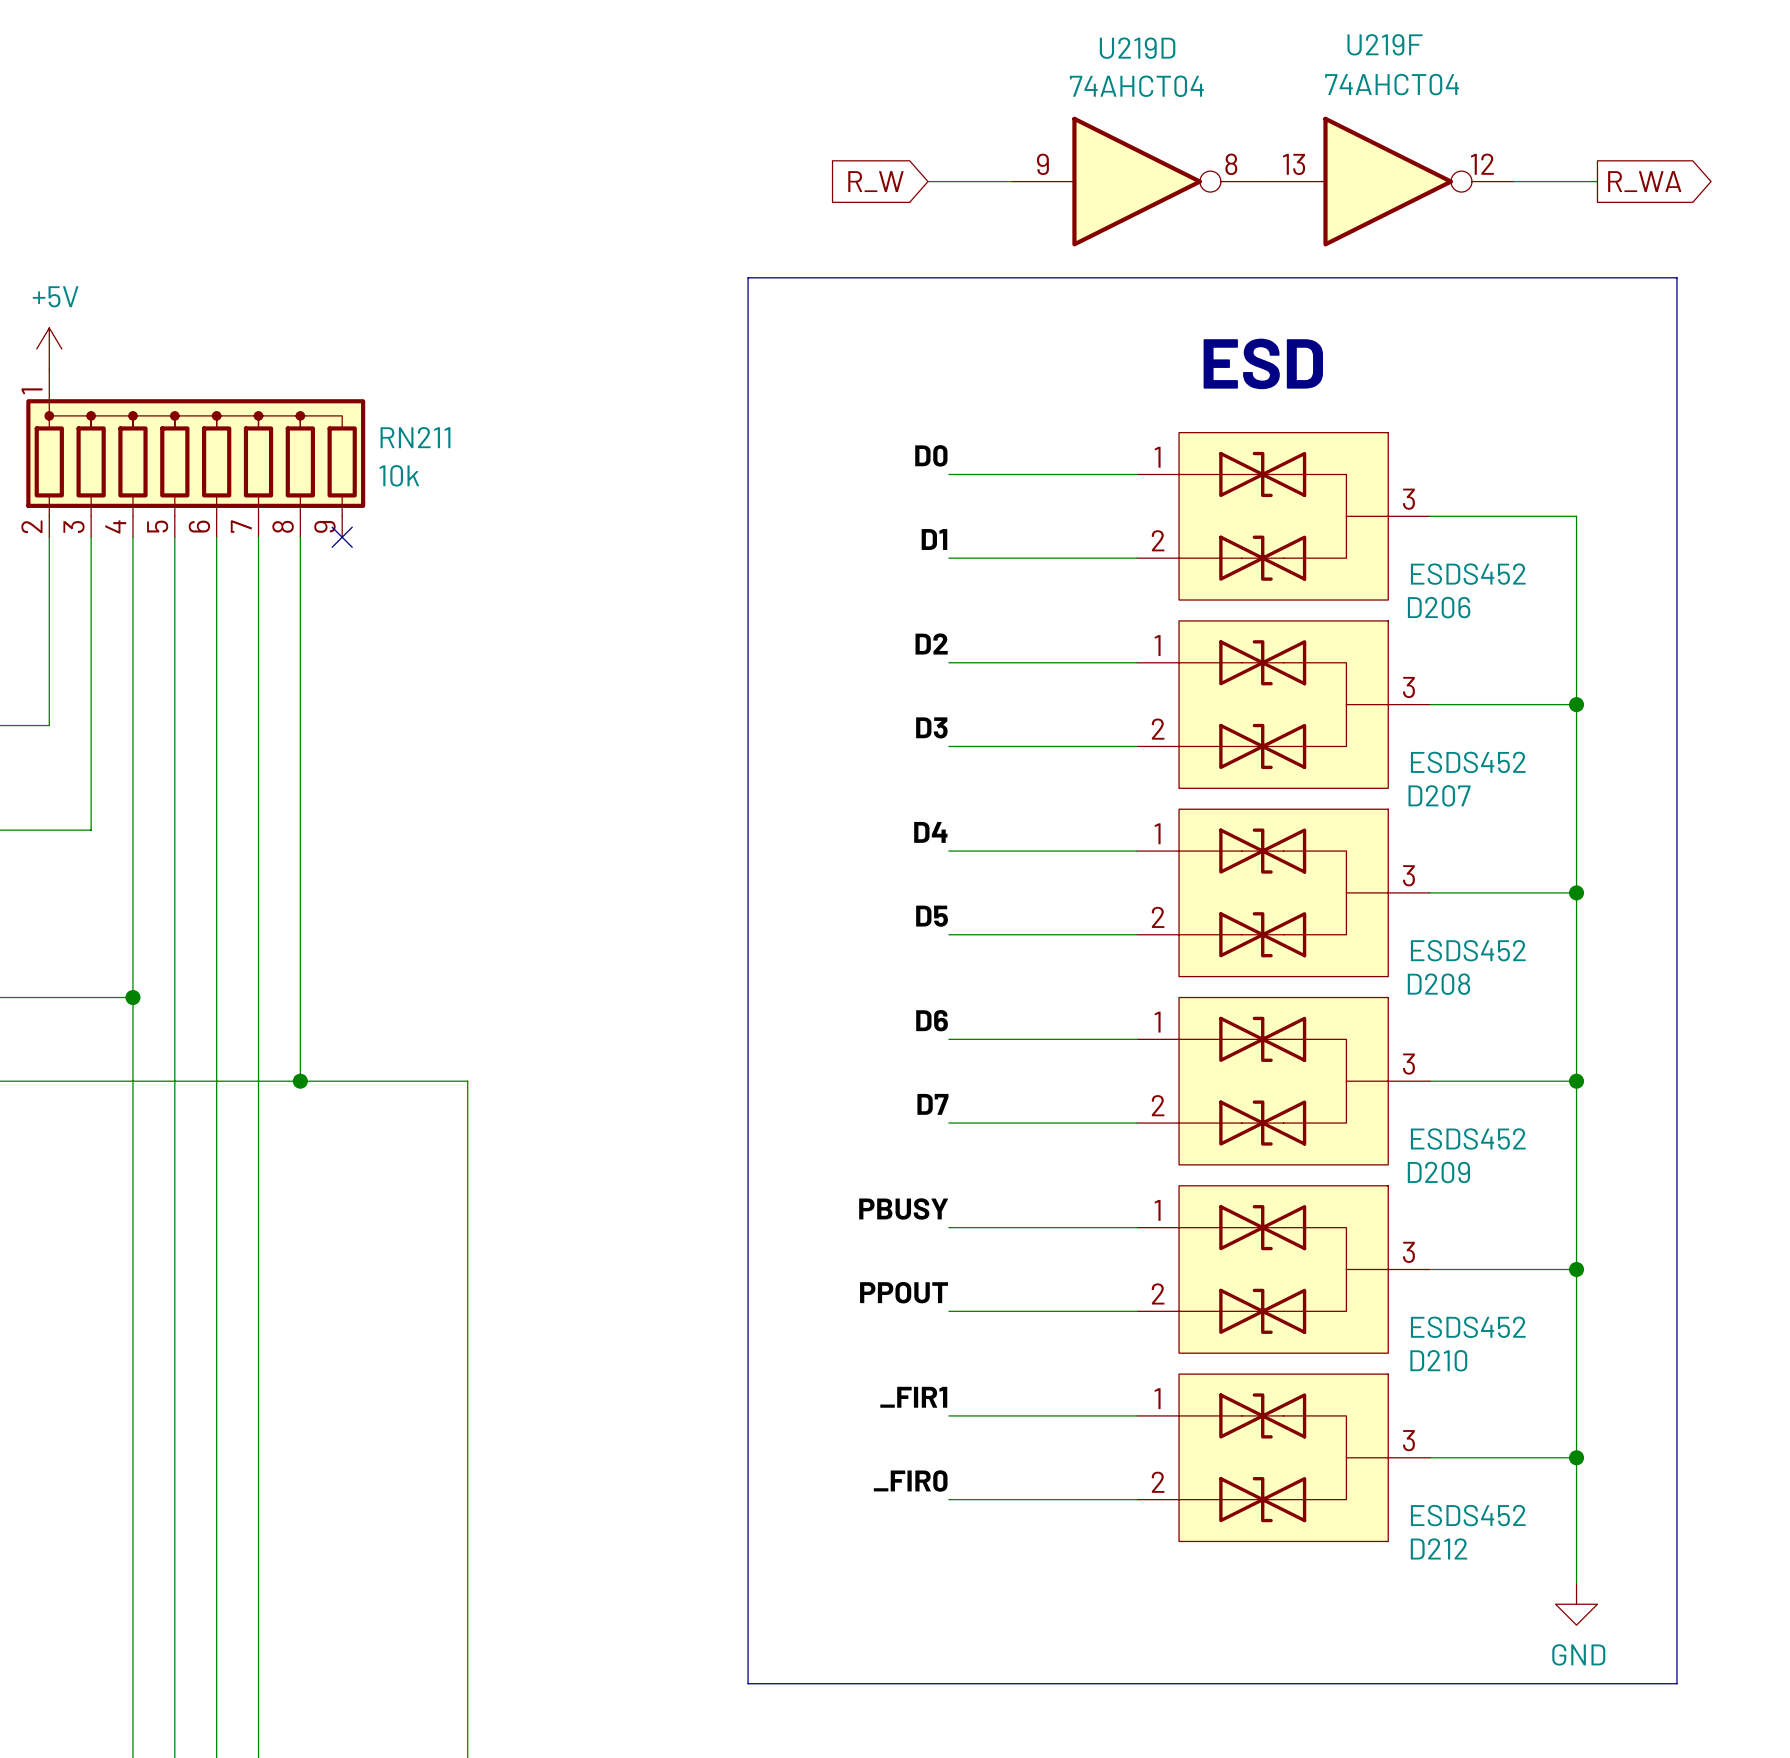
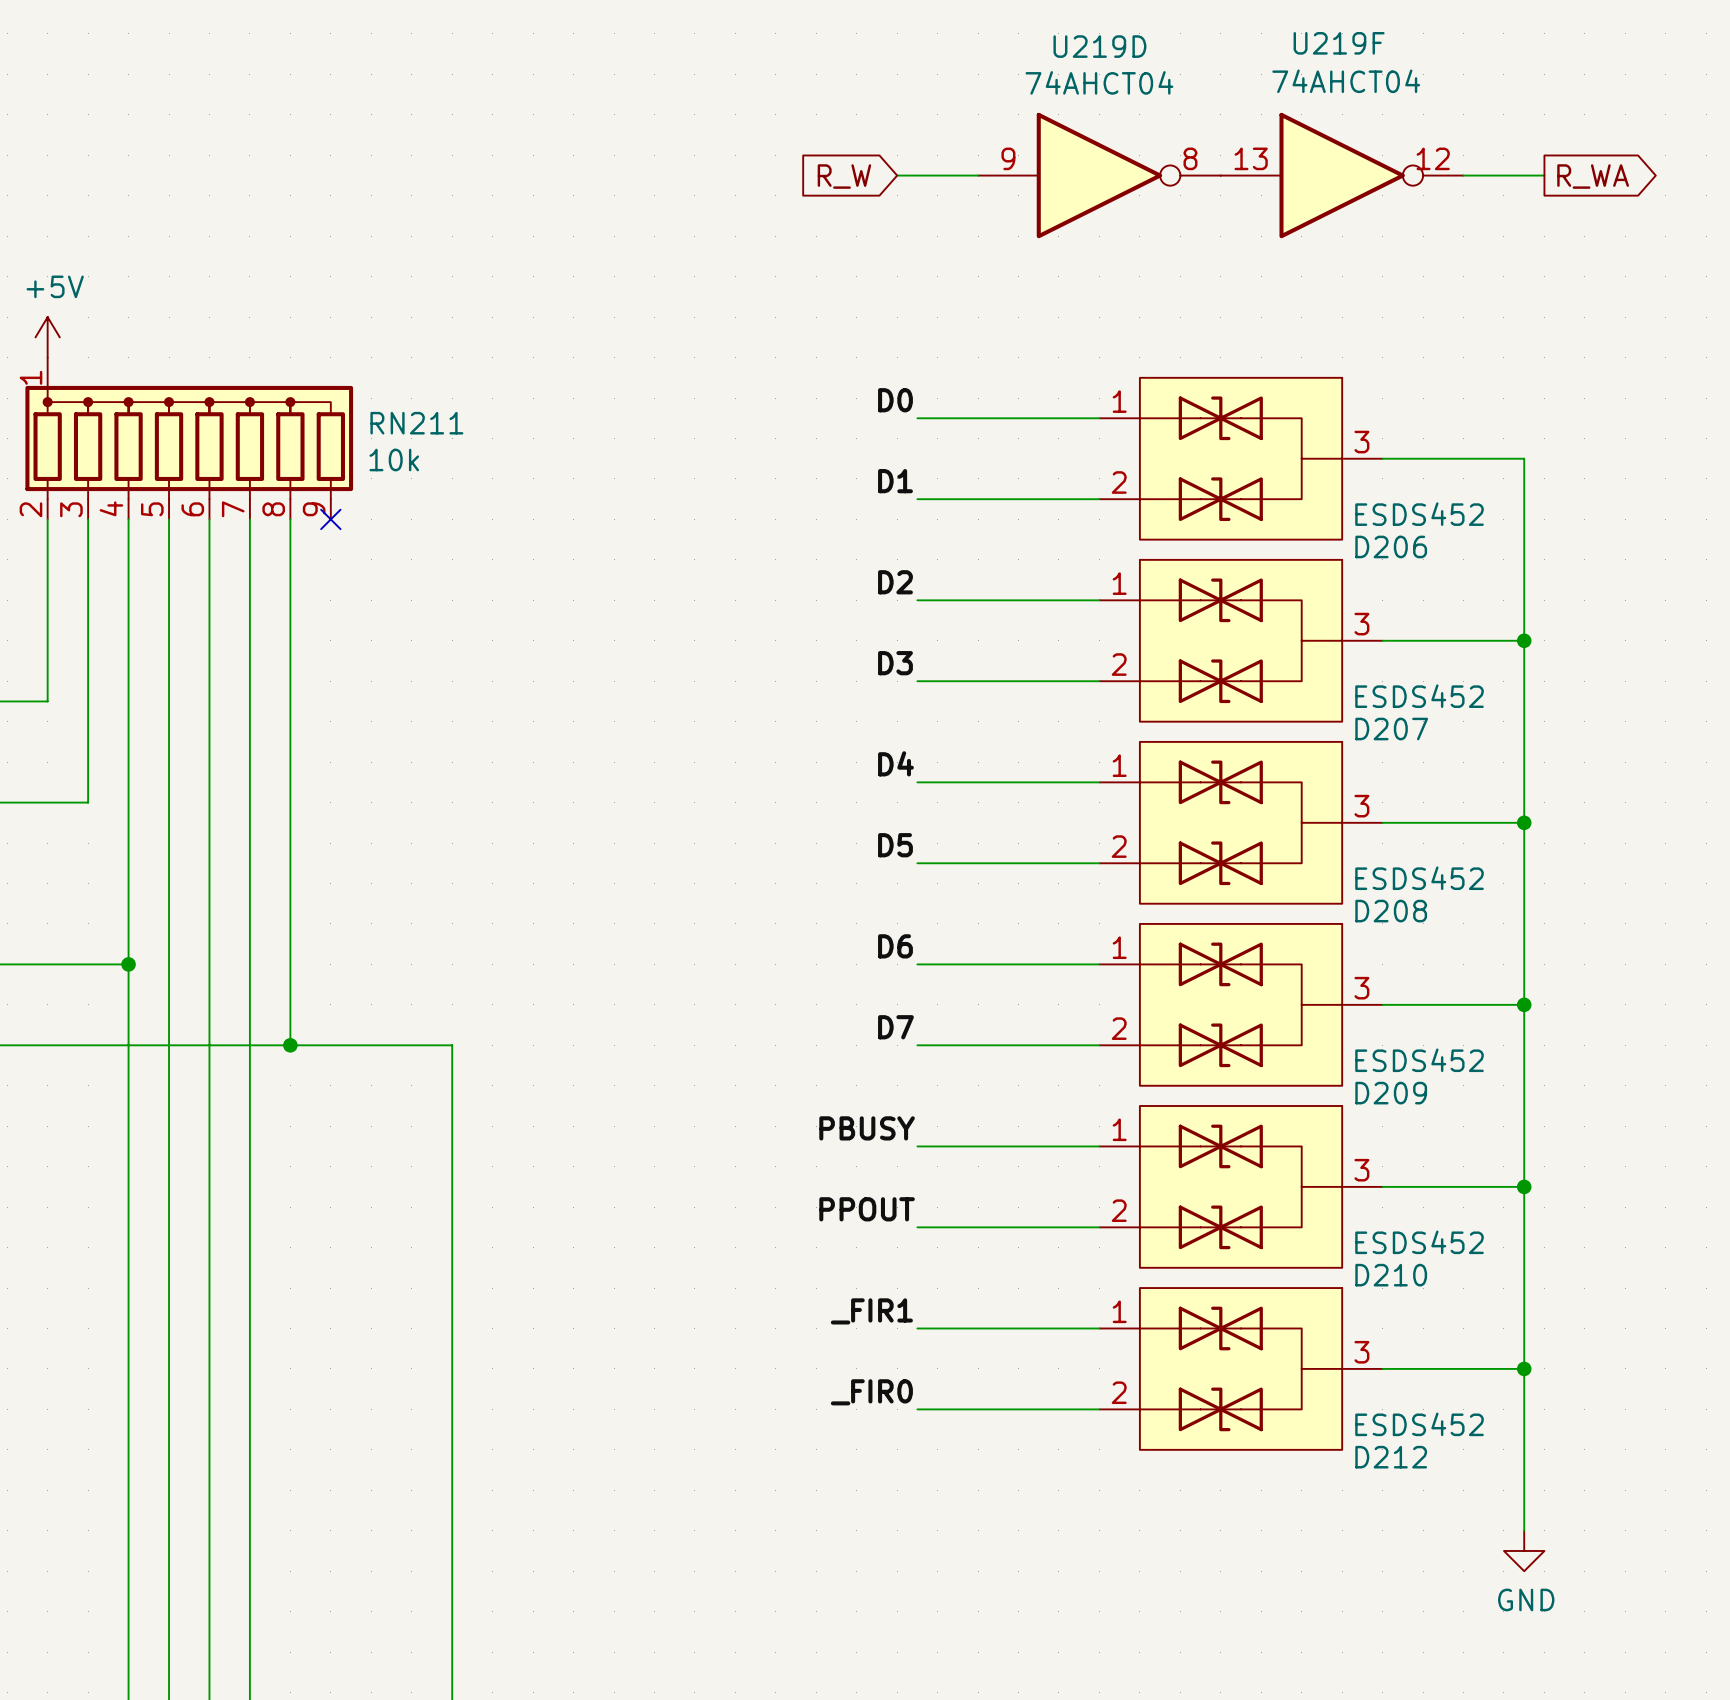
line: (748, 277) (1676, 277) (1676, 1683) (748, 1683) (748, 277) -> none
text: ESD (1263, 363) -> none
label position: D0 (931, 455) -> D0 (895, 400)
wire: (948, 474) (1137, 474) -> (917, 418) (1099, 418)
D206 position: (1283, 516) -> (1241, 458)
wire: (1430, 516) (1576, 516) -> (1382, 458) (1524, 458) (1524, 499)
label position: D1 (934, 539) -> D1 (895, 481)
wire: (948, 558) (1137, 558) -> (917, 499) (1099, 499)
label position: D2 (931, 643) -> D2 (895, 582)
wire: (948, 662) (1137, 662) -> (917, 600) (1099, 600)
D207 position: (1283, 704) -> (1241, 640)
wire: (1430, 704) (1576, 704) -> (1382, 640) (1524, 640)
junction position: (1576, 704) -> (1524, 640)
label position: D3 (931, 727) -> D3 (895, 663)
wire: (948, 746) (1137, 746) -> (917, 681) (1099, 681)
label position: D4 (930, 832) -> D4 (895, 763)
wire: (948, 851) (1137, 851) -> (917, 782) (1099, 782)
D208 position: (1283, 892) -> (1241, 822)
wire: (1430, 892) (1576, 892) -> (1382, 822) (1524, 822)
junction position: (1576, 892) -> (1524, 822)
label position: D5 (932, 916) -> D5 (895, 845)
wire: (948, 934) (1137, 934) -> (917, 863) (1099, 863)
label position: D6 (932, 1020) -> D6 (895, 946)
wire: (948, 1039) (1137, 1039) -> (917, 964) (1099, 964)
D209 position: (1283, 1081) -> (1241, 1004)
wire: (1430, 1081) (1576, 1081) -> (1382, 1004) (1524, 1004)
junction position: (1576, 1081) -> (1524, 1004)
label position: D7 (932, 1104) -> D7 (895, 1027)
wire: (948, 1123) (1137, 1123) -> (917, 1045) (1099, 1045)
label position: PBUSY (903, 1208) -> PBUSY (867, 1128)
wire: (948, 1227) (1137, 1227) -> (917, 1146) (1099, 1146)
D210 position: (1283, 1269) -> (1241, 1186)
wire: (1430, 1269) (1576, 1269) -> (1382, 1186) (1524, 1186)
junction position: (1576, 1269) -> (1524, 1186)
label position: PPOUT (904, 1292) -> PPOUT (867, 1209)
wire: (948, 1311) (1137, 1311) -> (917, 1227) (1099, 1227)
label position: _FIR1 (913, 1397) -> _FIR1 (871, 1311)
wire: (948, 1415) (1137, 1415) -> (917, 1328) (1099, 1328)
D212 position: (1283, 1457) -> (1241, 1368)
wire: (1430, 1457) (1576, 1457) -> (1382, 1368) (1524, 1368)
junction position: (1576, 1457) -> (1524, 1368)
label position: _FIR0 (910, 1481) -> _FIR0 (871, 1392)
wire: (948, 1499) (1137, 1499) -> (917, 1409) (1099, 1409)

